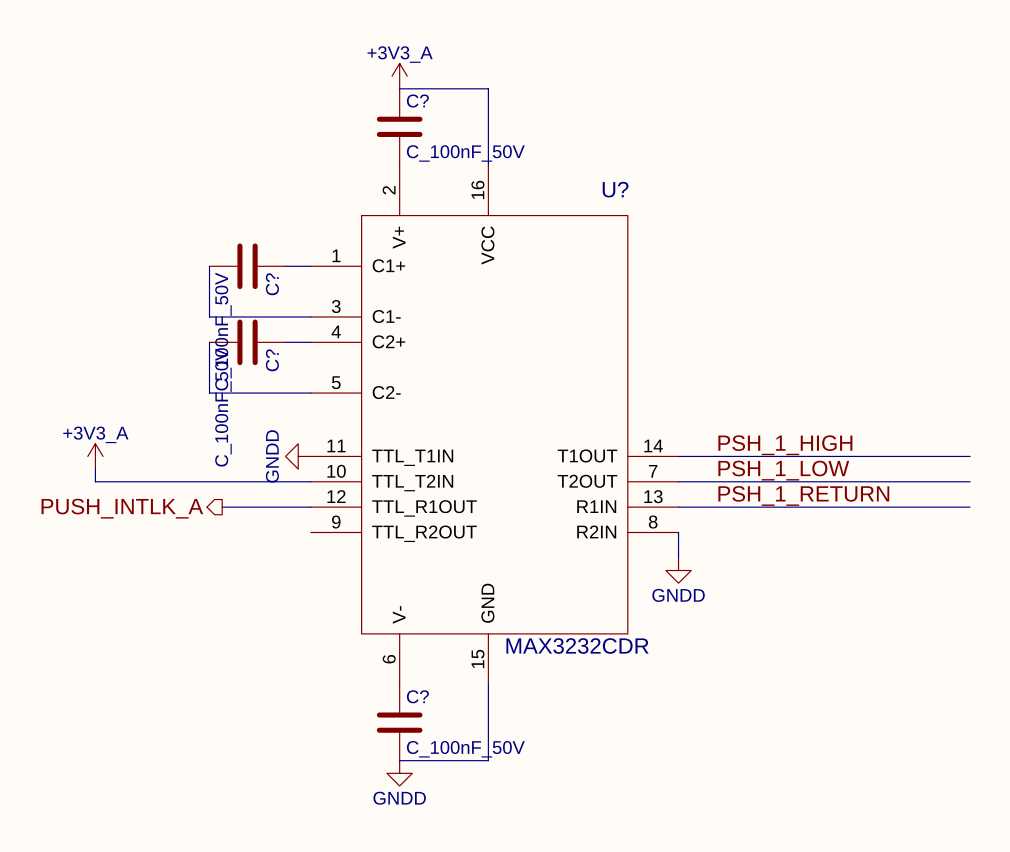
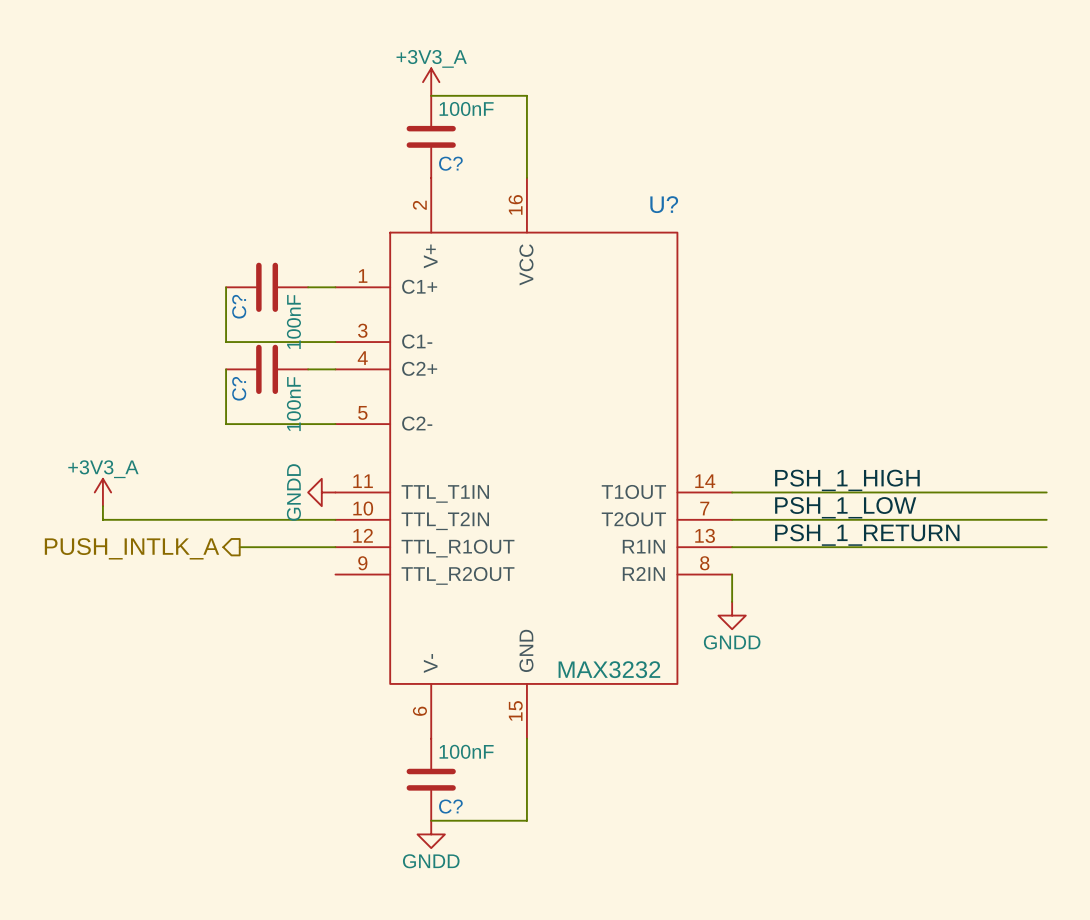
C? name position: C? (417, 101) -> C? (450, 163)
C? value: C_100nF_50V (465, 153) -> 100nF (466, 108)
C? name position: C? (272, 284) -> C? (239, 306)
C? value: C_100nF_50V (223, 331) -> 100nF (293, 321)
C? name position: C? (272, 360) -> C? (239, 388)
C? value: C_100nF_50V (223, 407) -> 100nF (293, 404)
U? value: MAX3232CDR (577, 646) -> MAX3232 (609, 669)
C? name position: C? (417, 696) -> C? (450, 806)
C? value: C_100nF_50V (465, 749) -> 100nF (466, 751)

